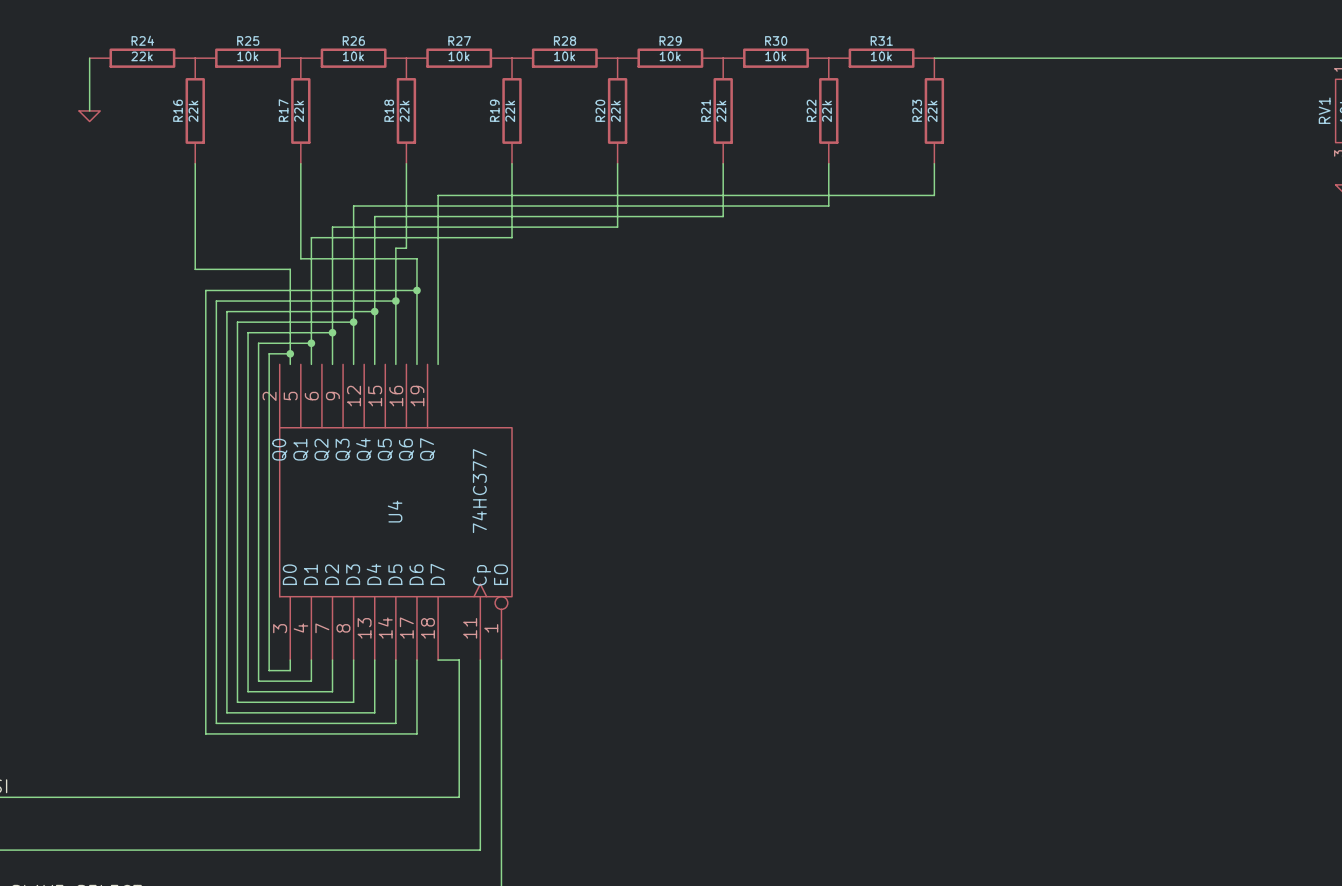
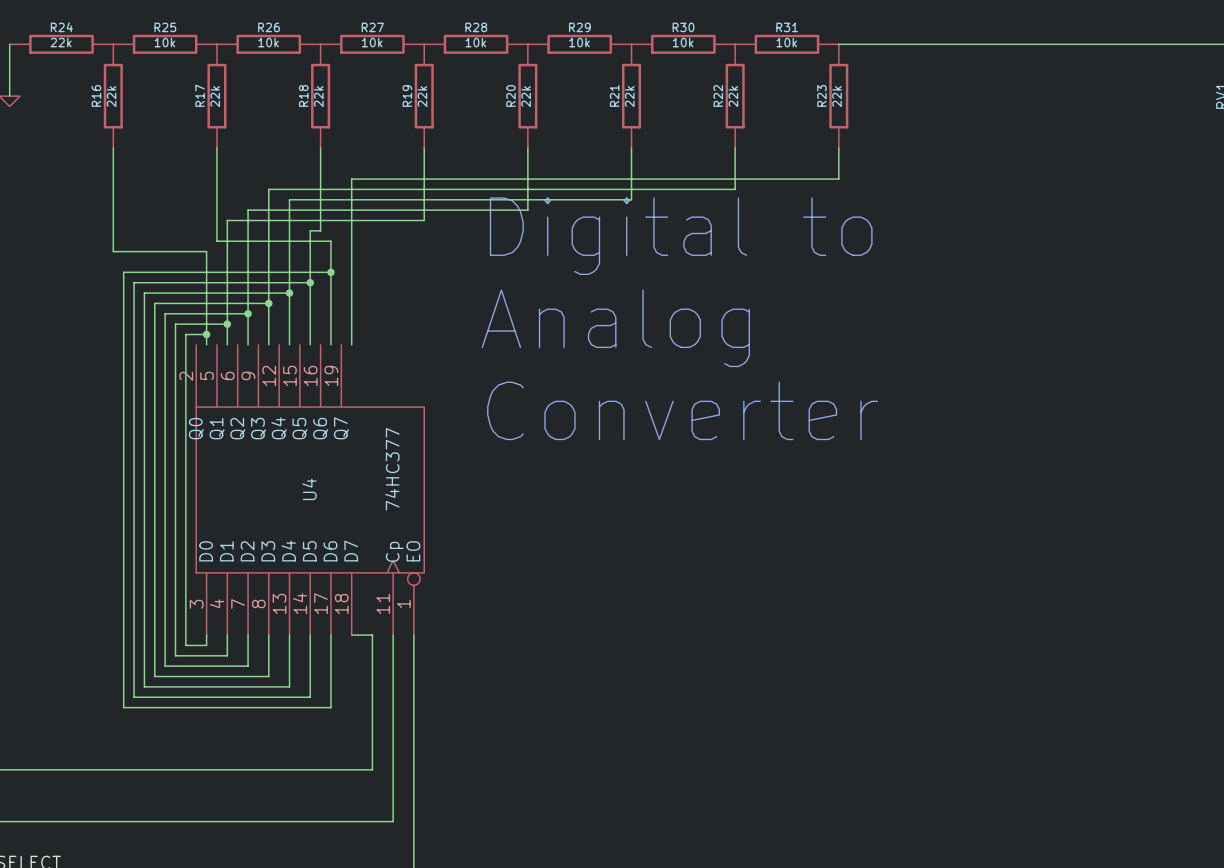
text: none -> Digital to (681, 236)
text: none -> Analog (615, 328)
text: none -> Converter (682, 410)

